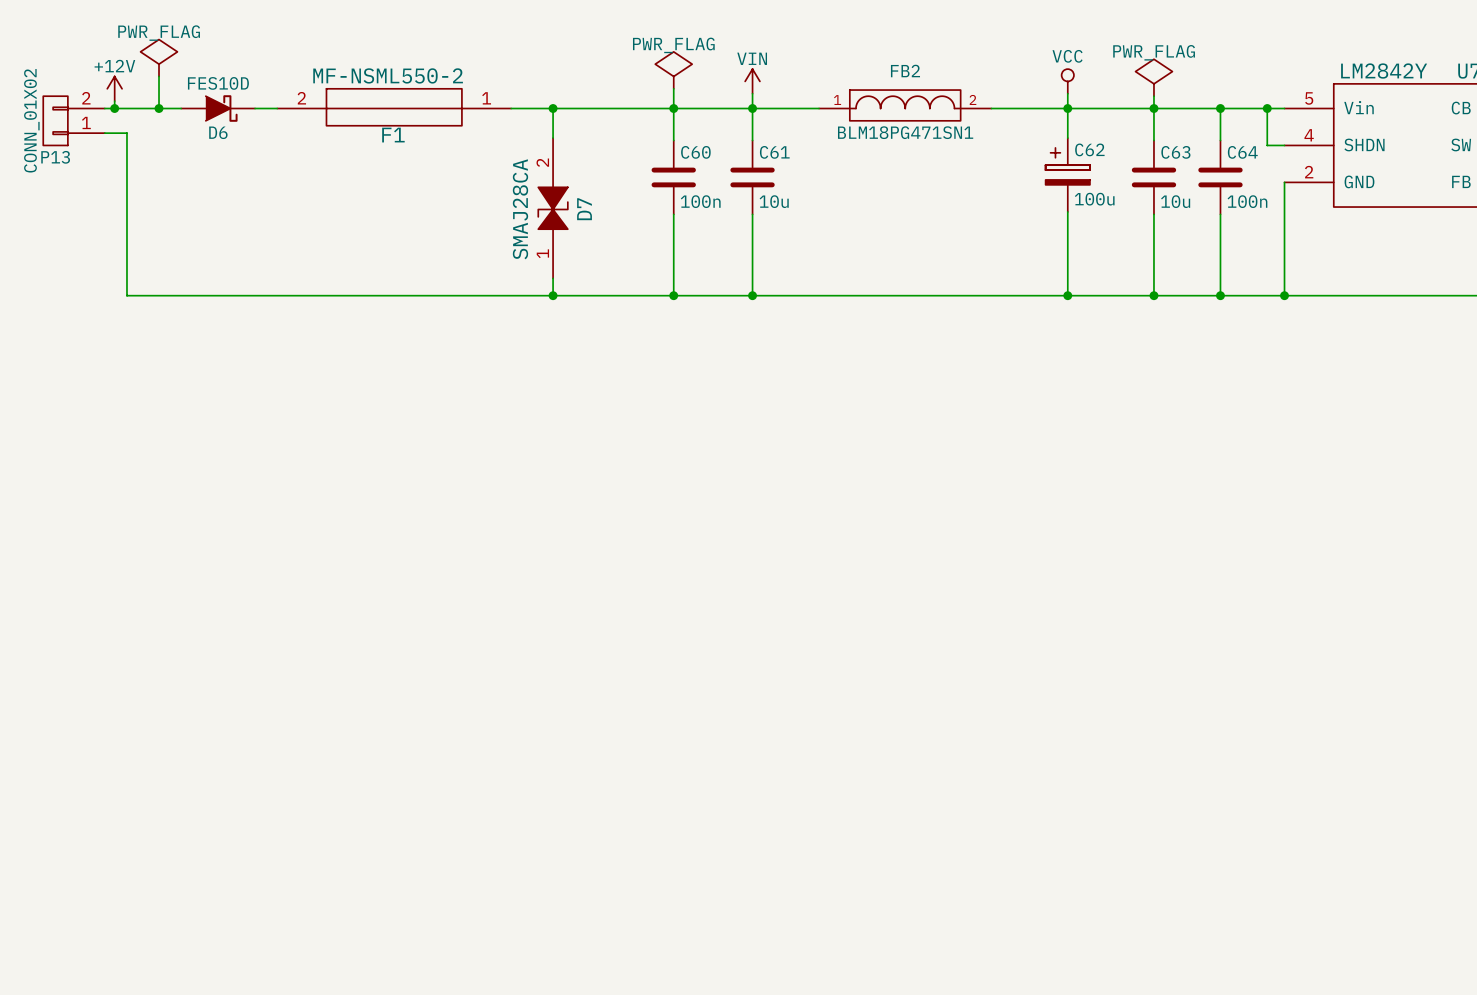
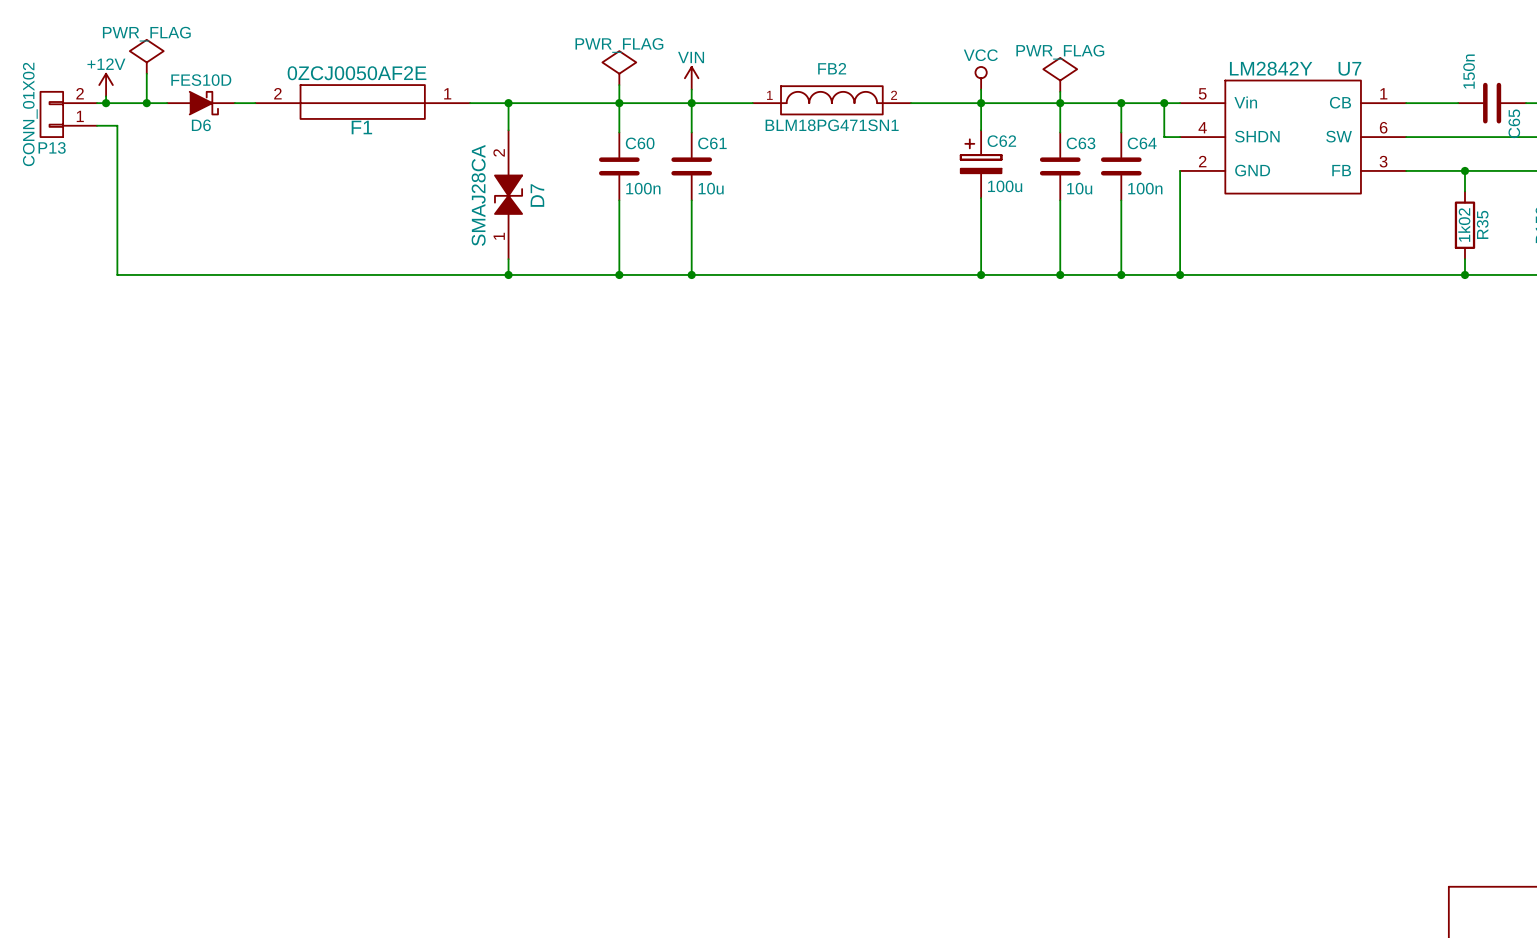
F1 value: MF-NSML550-2 (388, 75) -> 0ZCJ0050AF2E (357, 73)

